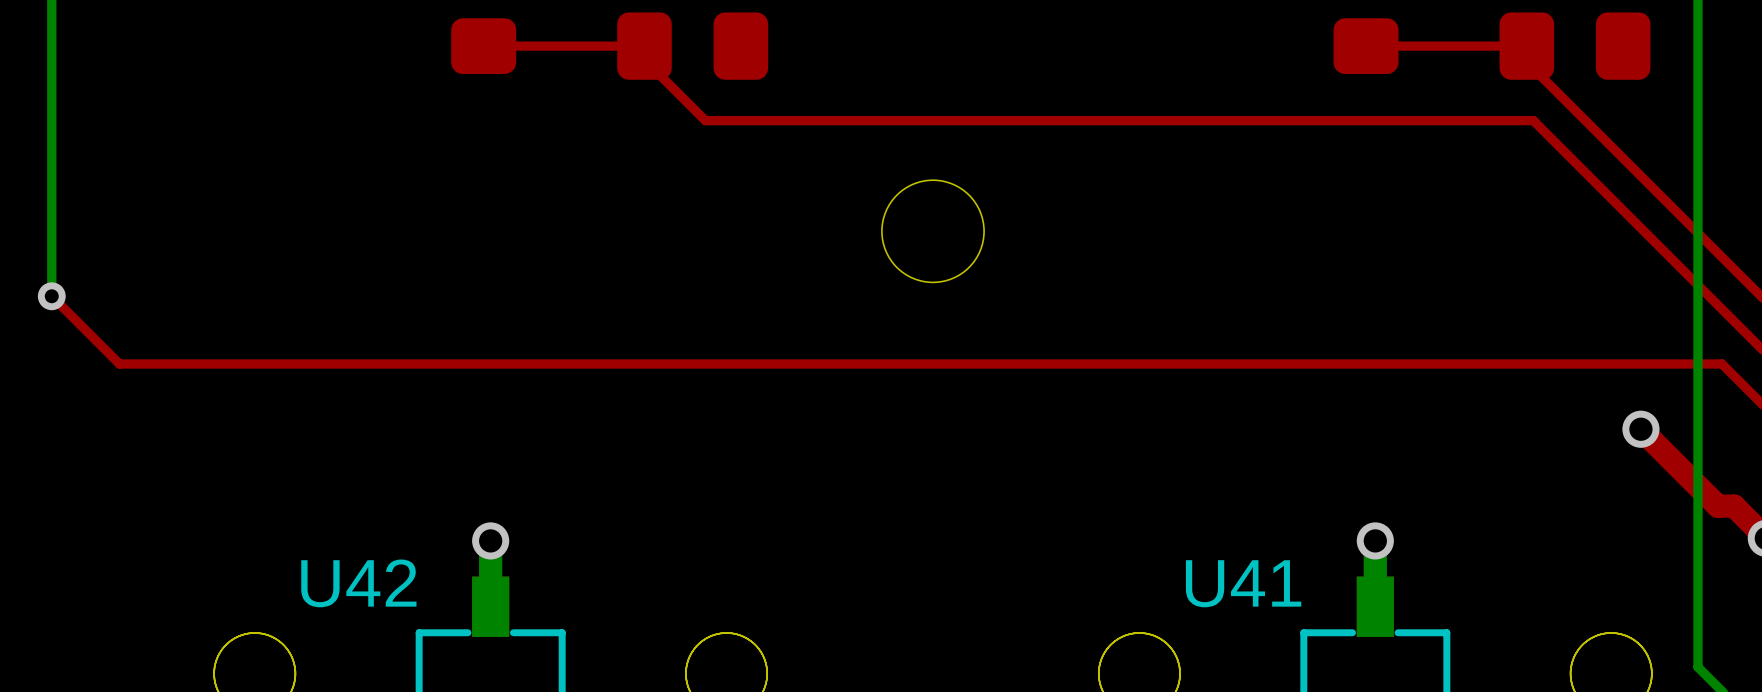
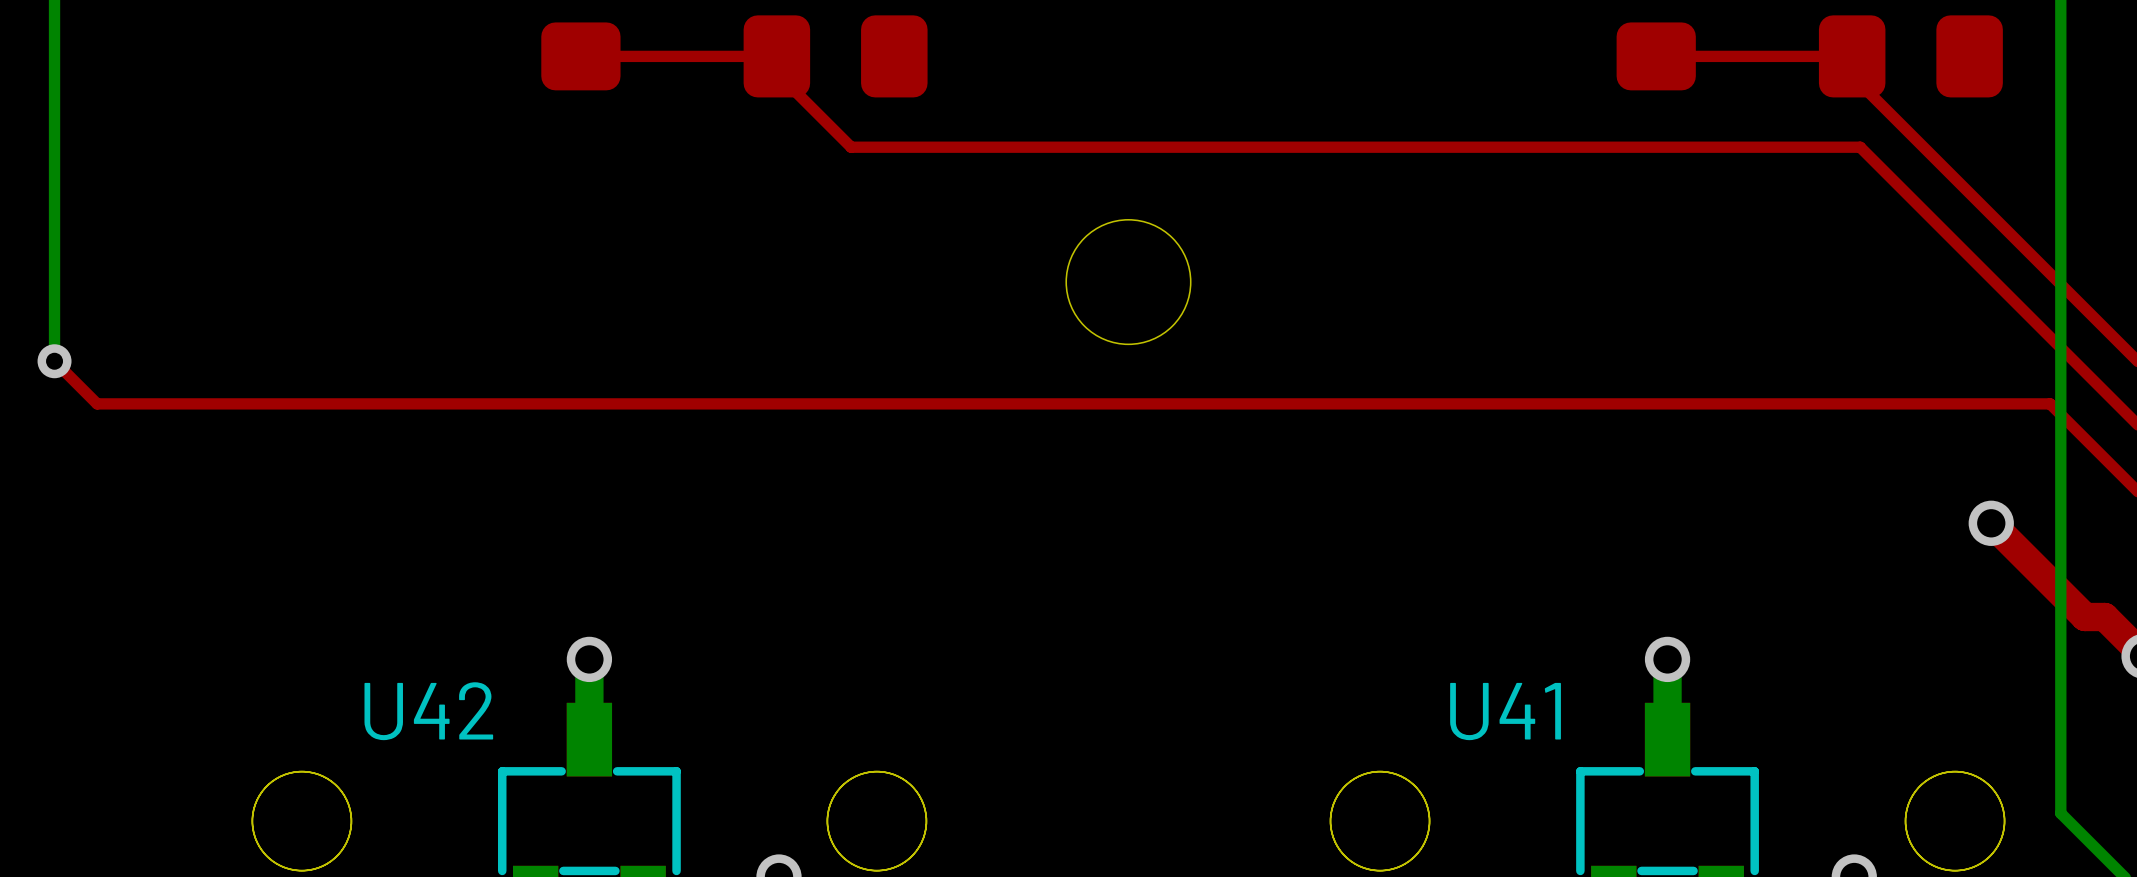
top track: (86, 331) (119, 363) (1721, 363) -> (97, 403) (2050, 403) (2090, 443)

